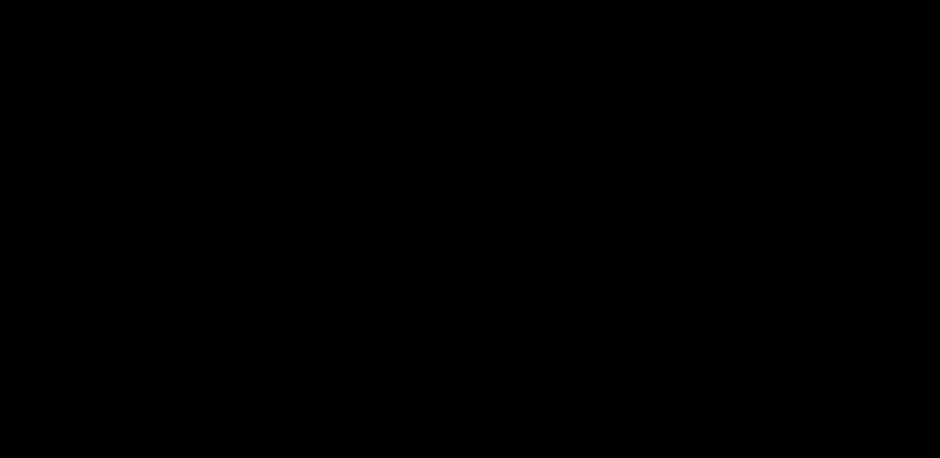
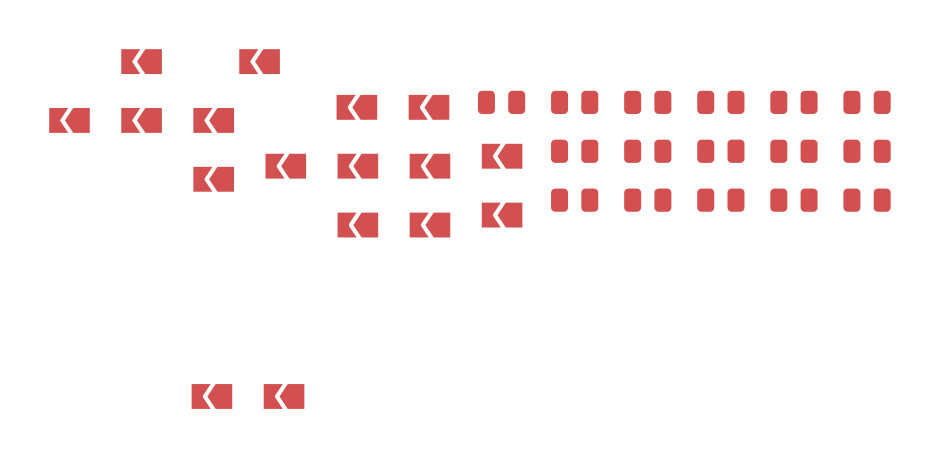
part: none -> (141, 61)
part: none -> (259, 61)
part: none -> (501, 102)
part: none -> (574, 102)
part: none -> (647, 102)
part: none -> (720, 102)
part: none -> (793, 102)
part: none -> (867, 102)
part: none -> (356, 107)
part: none -> (428, 107)
part: none -> (69, 120)
part: none -> (141, 120)
part: none -> (213, 120)
part: none -> (574, 151)
part: none -> (647, 151)
part: none -> (720, 151)
part: none -> (793, 151)
part: none -> (867, 151)
part: none -> (502, 156)
part: none -> (285, 166)
part: none -> (357, 166)
part: none -> (429, 166)
part: none -> (213, 179)
part: none -> (574, 200)
part: none -> (647, 200)
part: none -> (720, 200)
part: none -> (793, 200)
part: none -> (867, 200)
part: none -> (502, 215)
part: none -> (357, 225)
part: none -> (429, 225)
part: none -> (211, 396)
part: none -> (284, 396)

